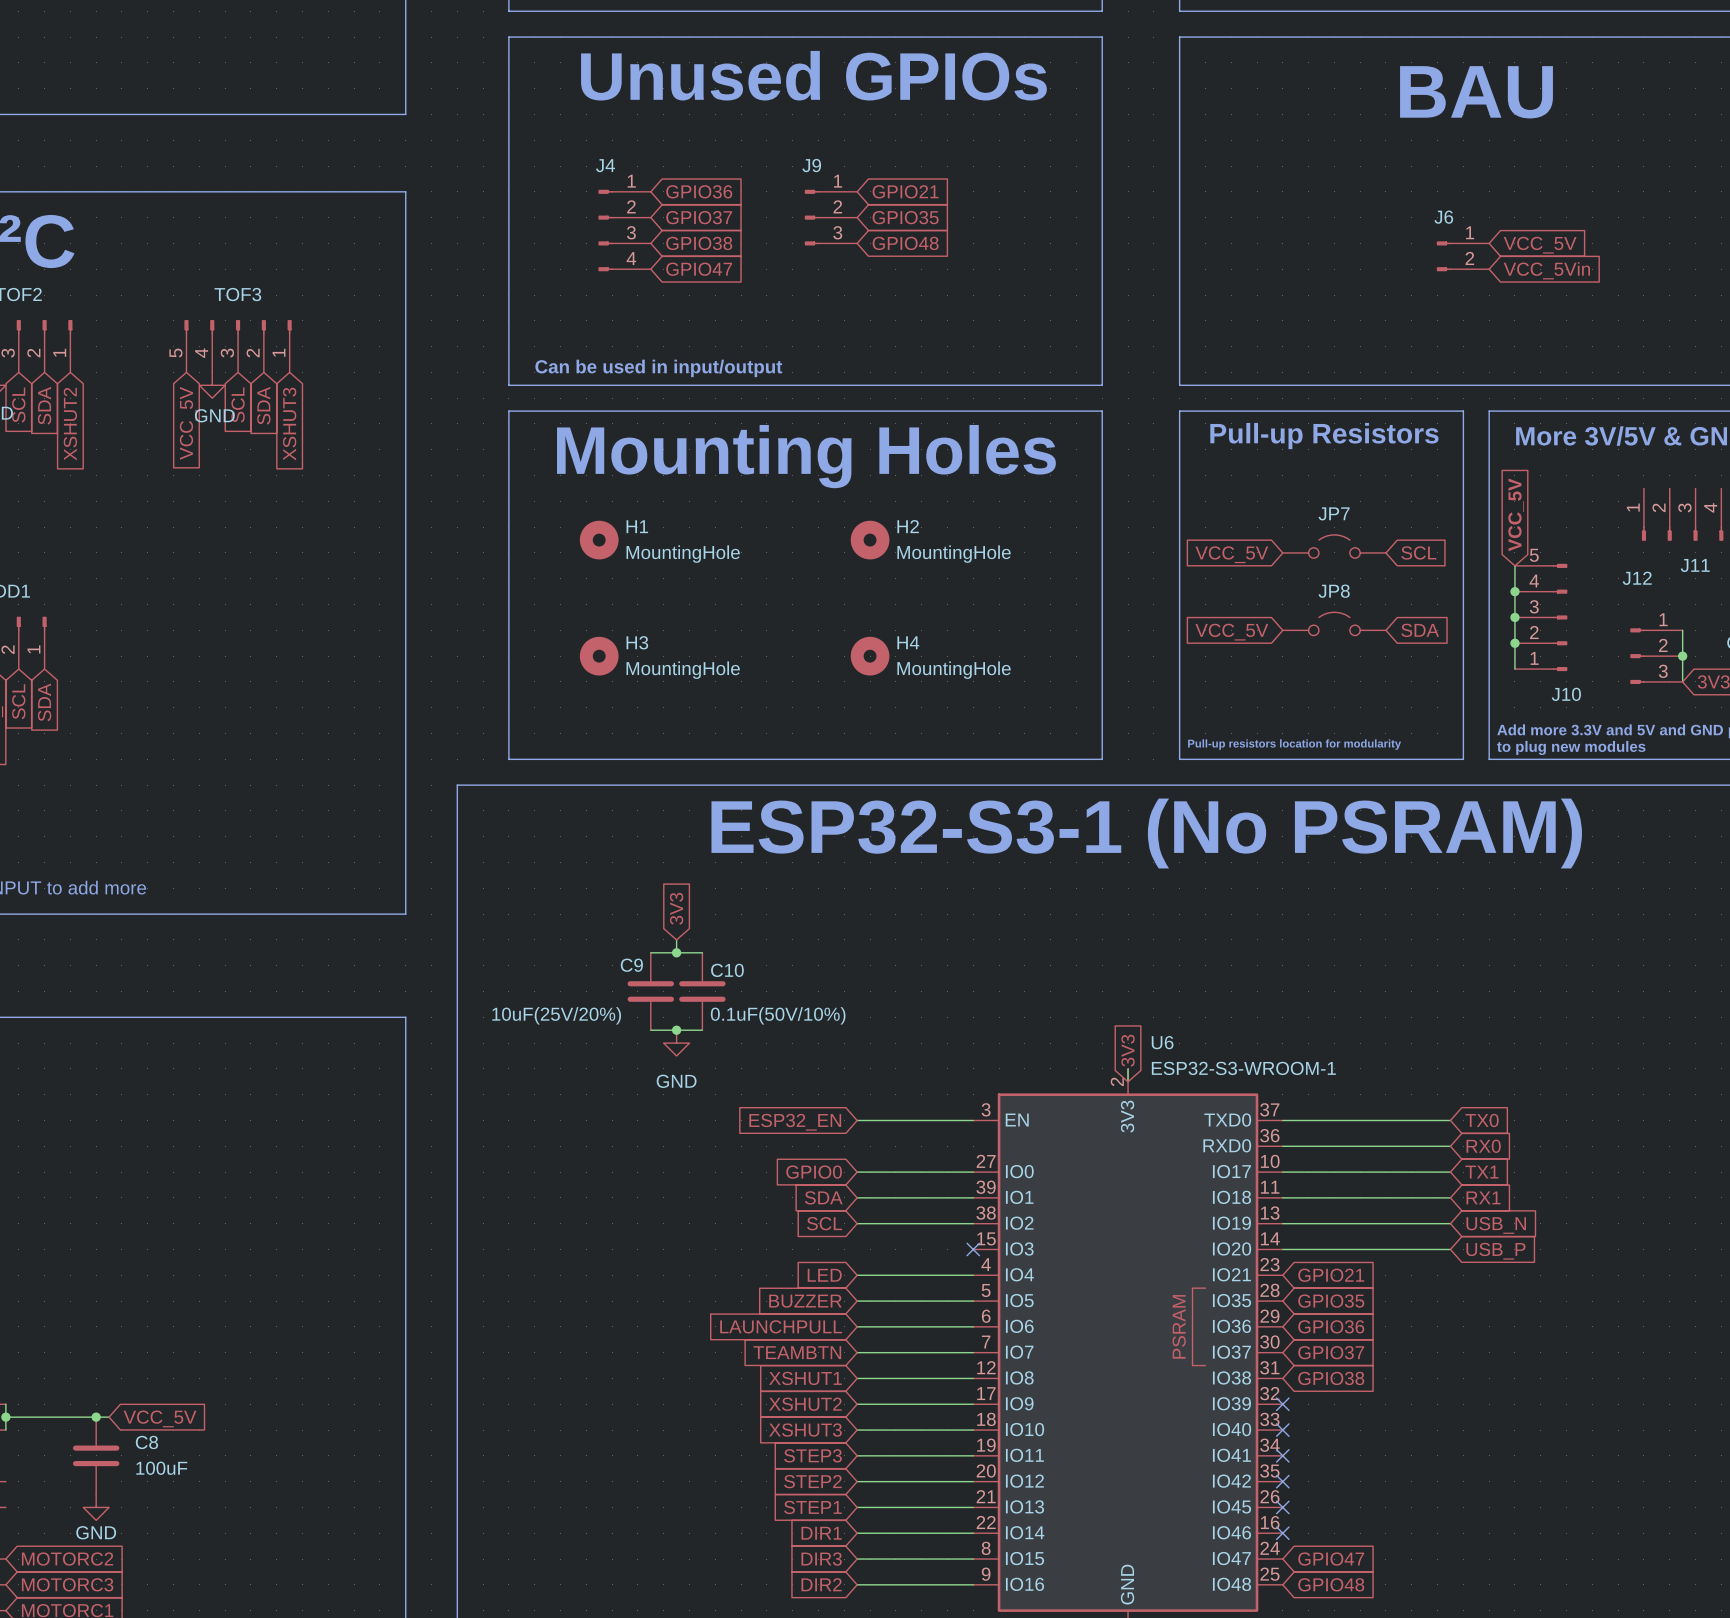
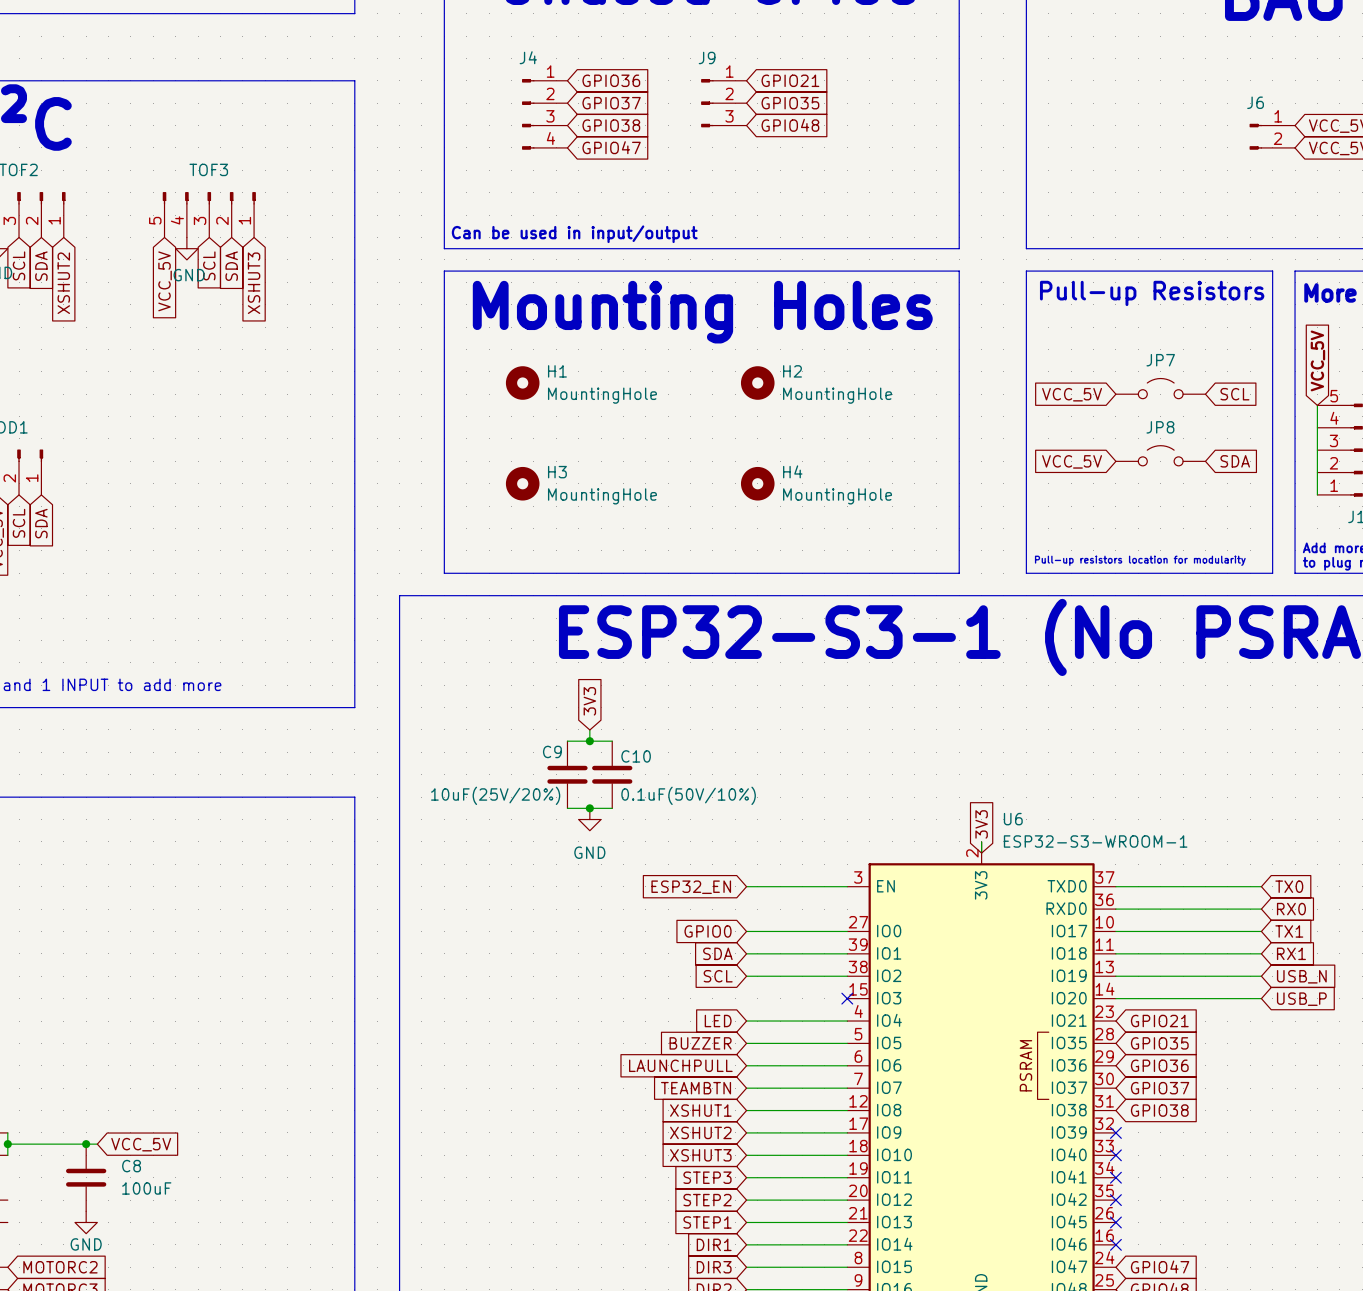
junction: (1514, 591) -> none
junction: (1514, 617) -> none
junction: (1514, 643) -> none

